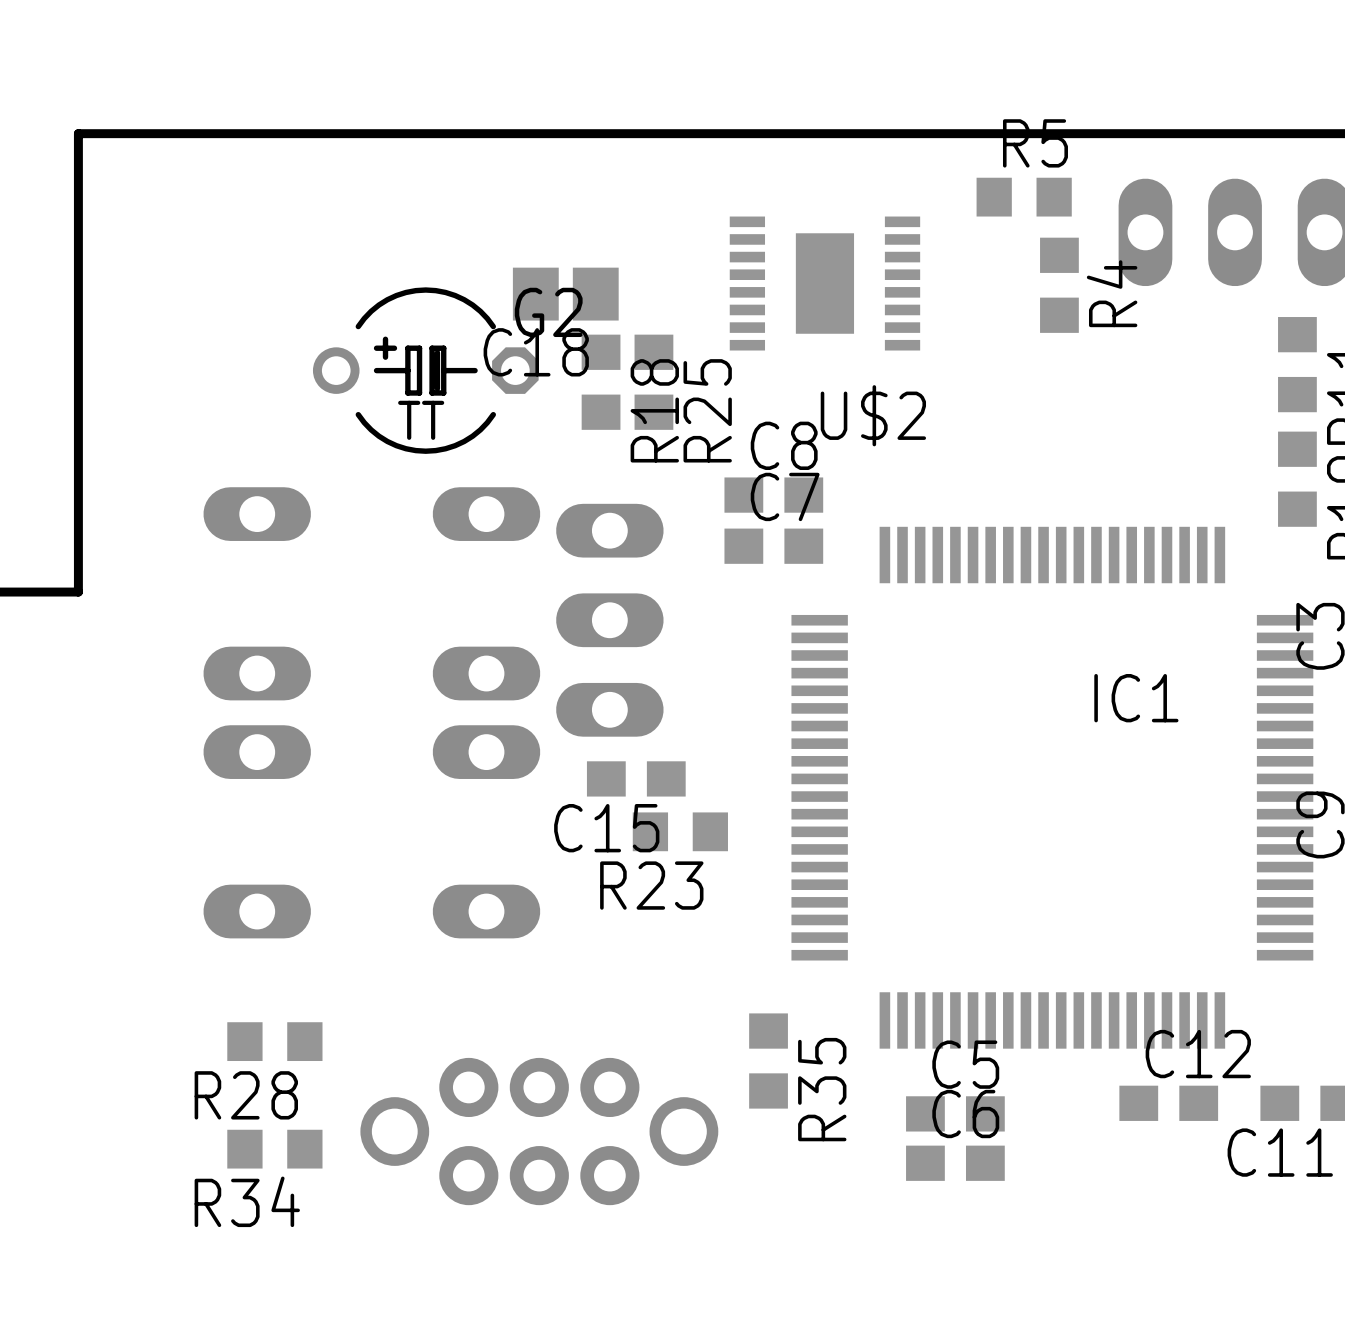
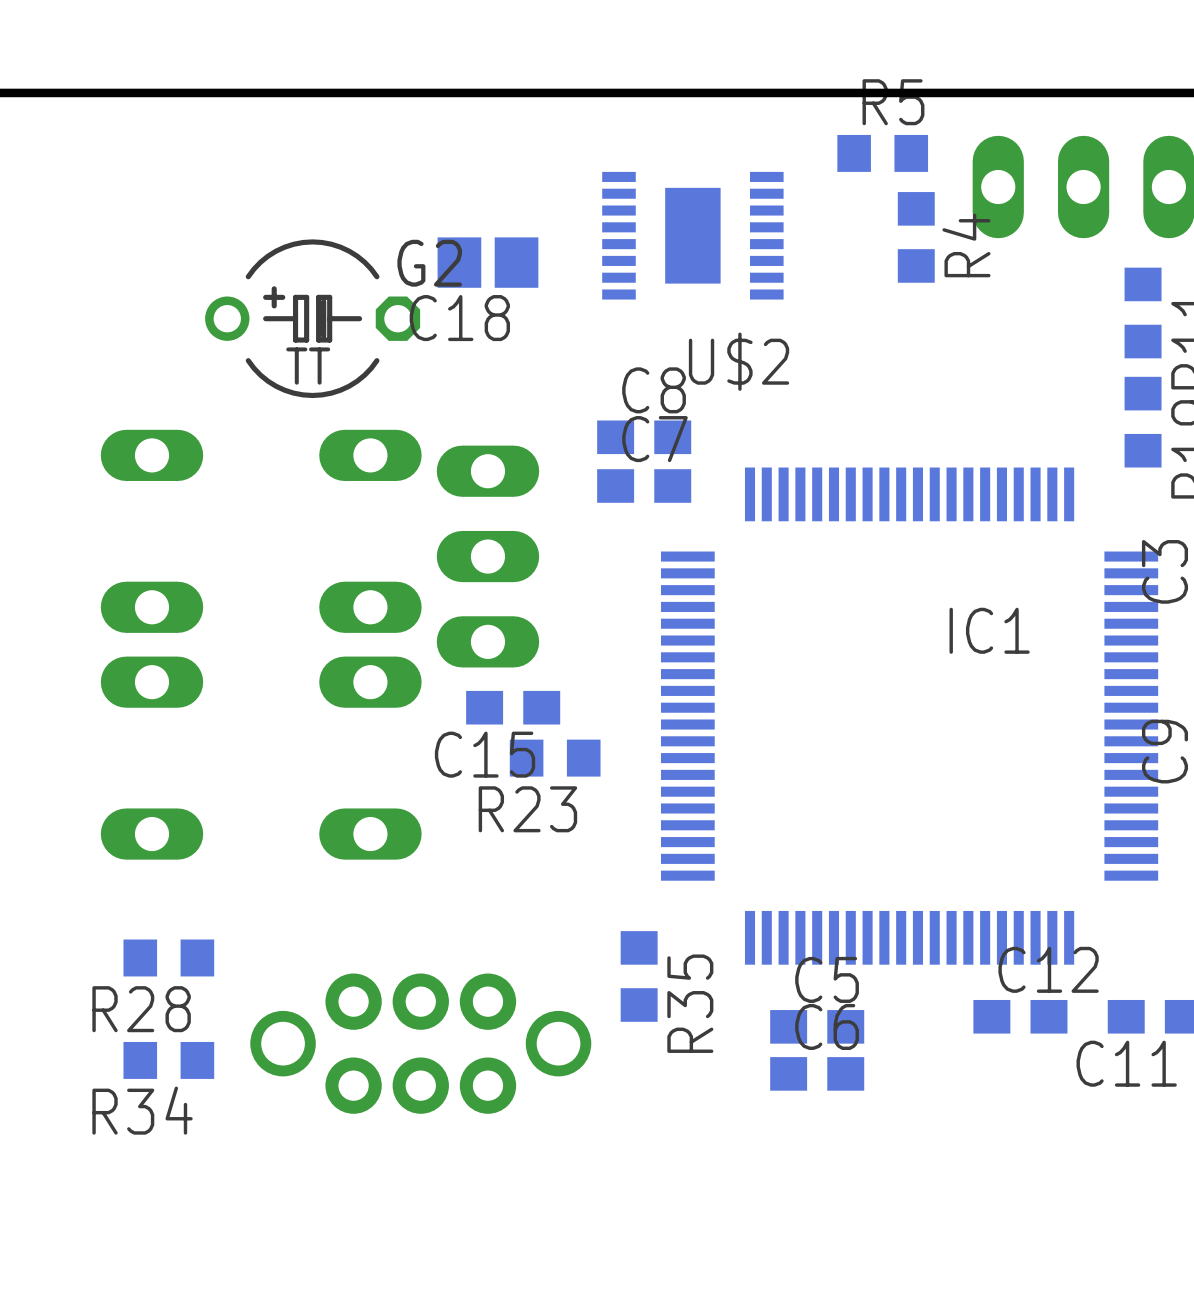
C18 position: (565, 294) -> (487, 262)
R18: (601, 382) -> none
R25: (653, 382) -> none

